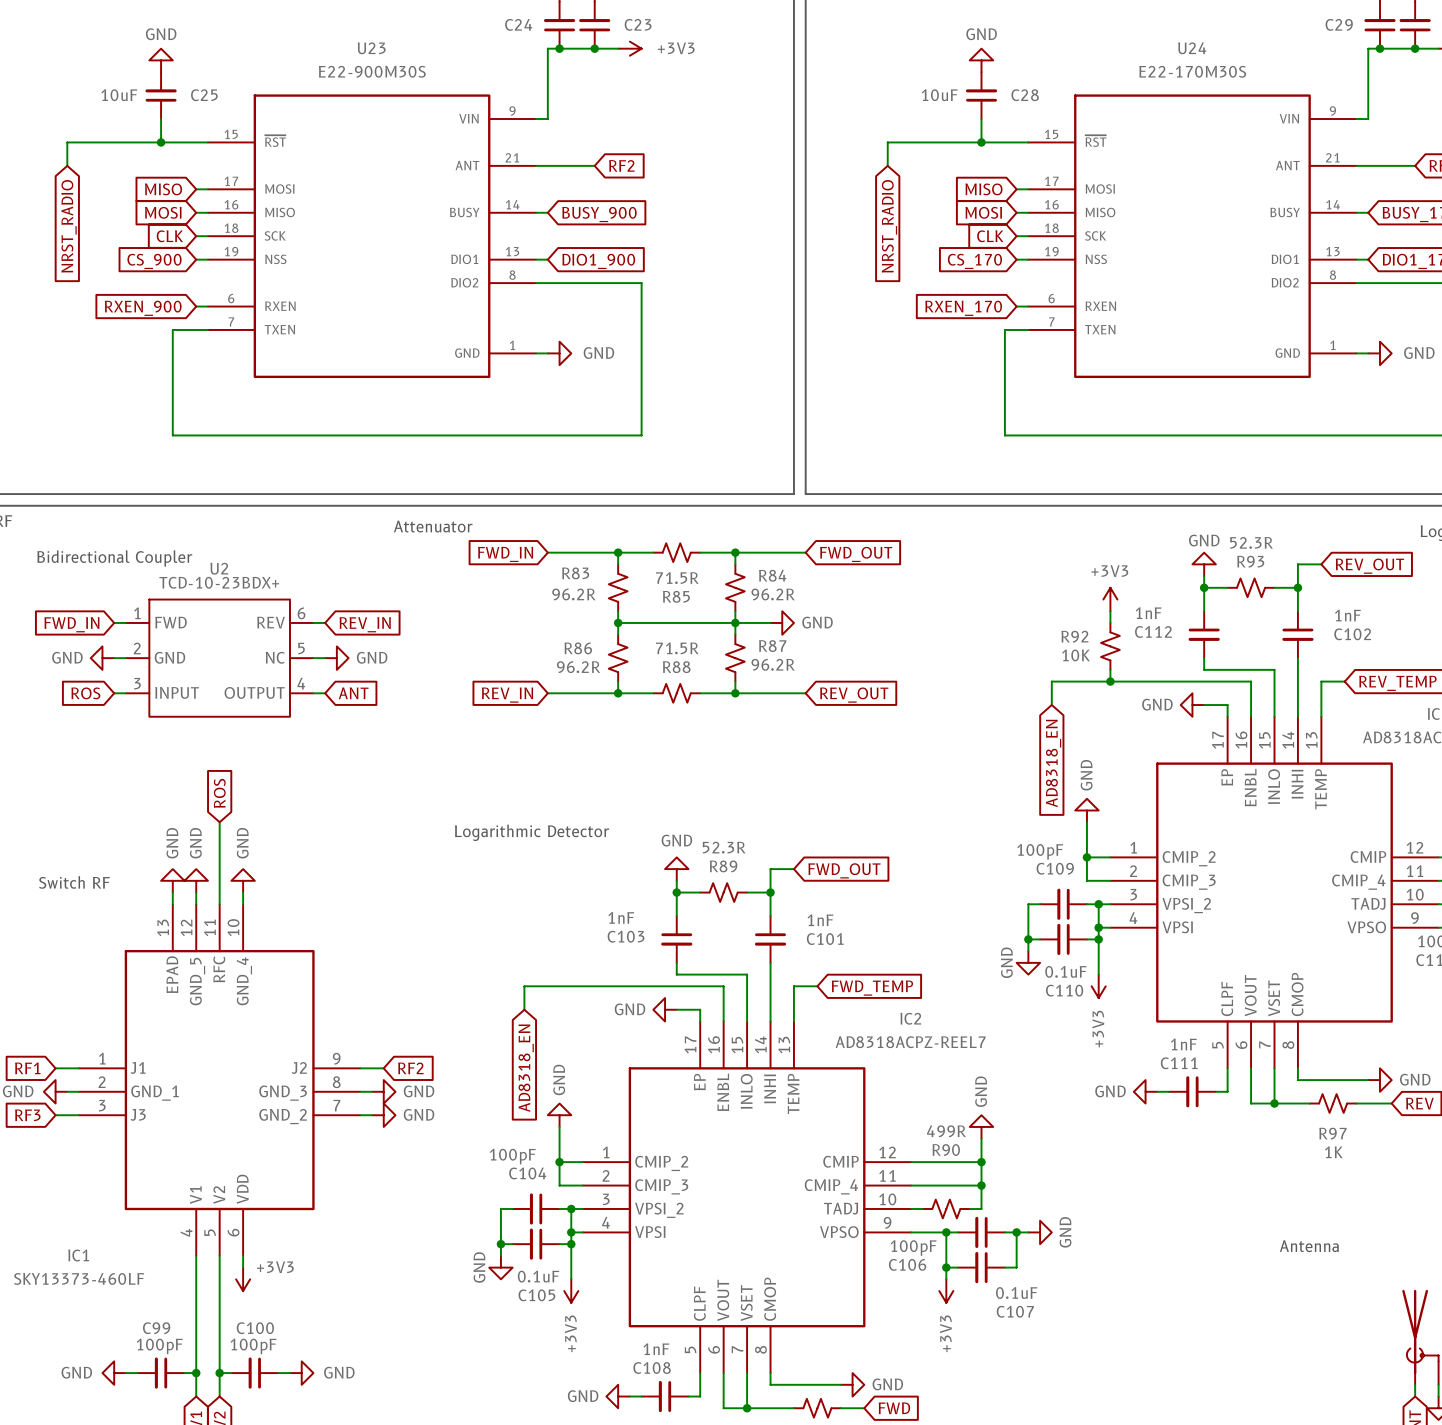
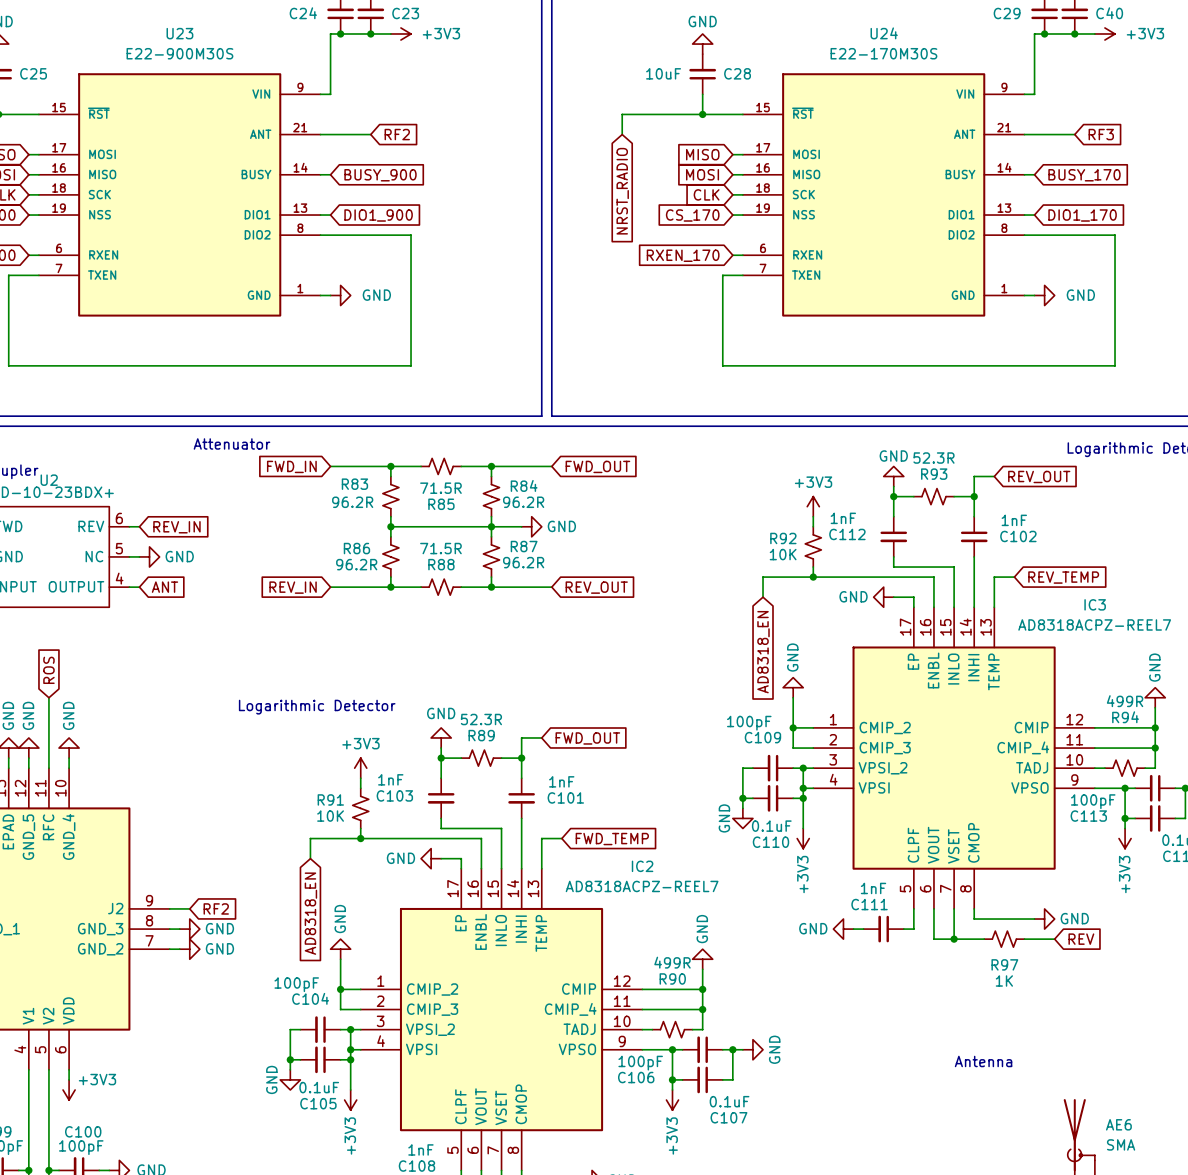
power symbol: none -> +3V3 (360, 768)
wire: none -> (360, 778) (360, 788)
R91: none -> 10K (360, 808)
wire: none -> (360, 828) (360, 838)
junction: none -> (360, 838)

